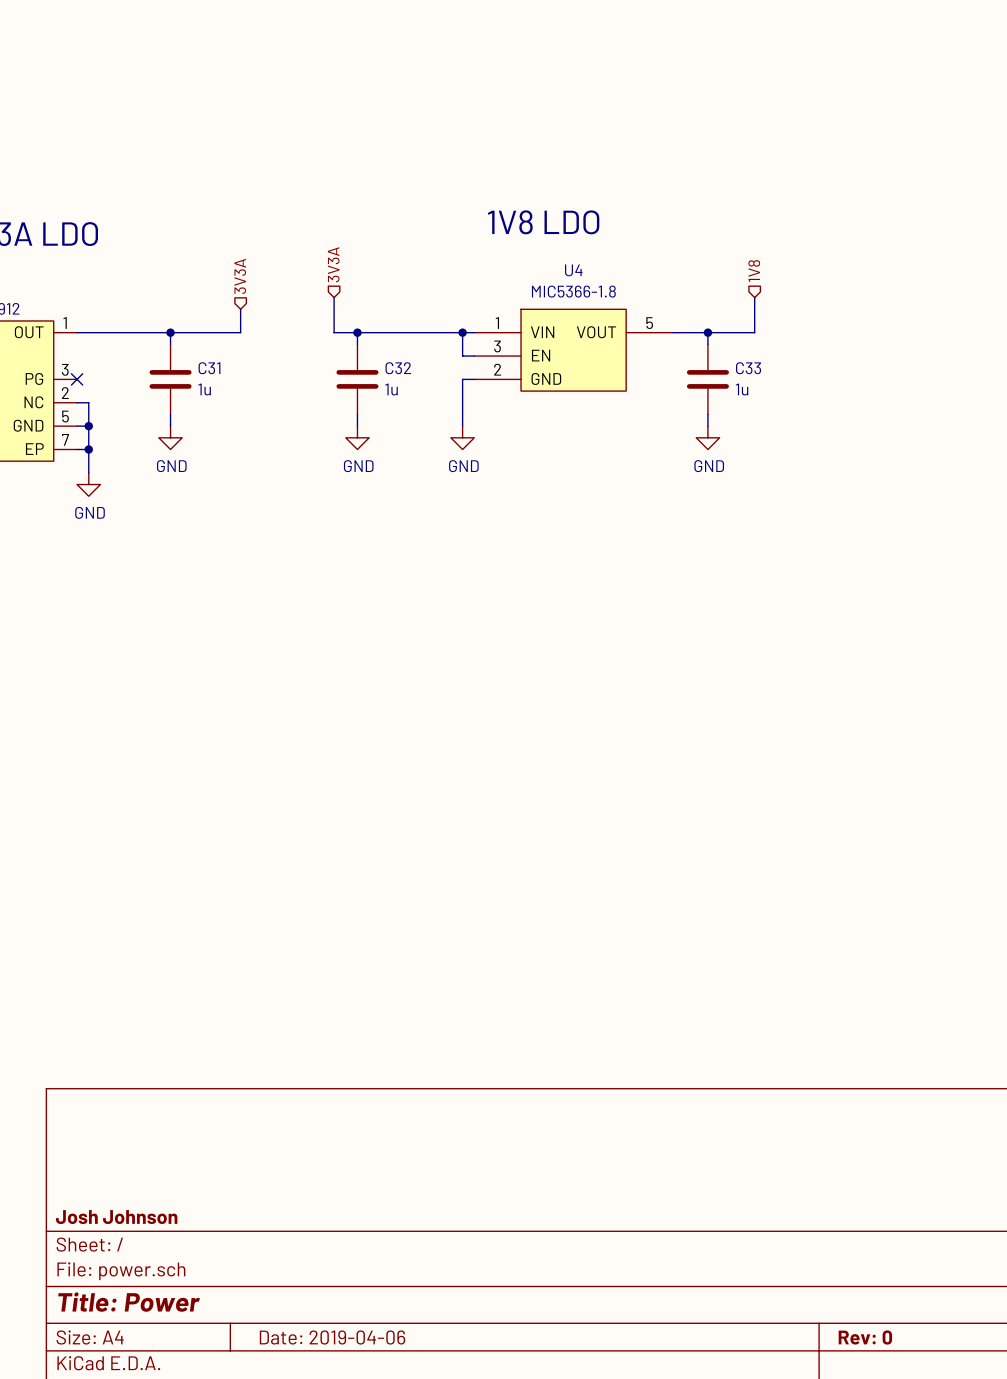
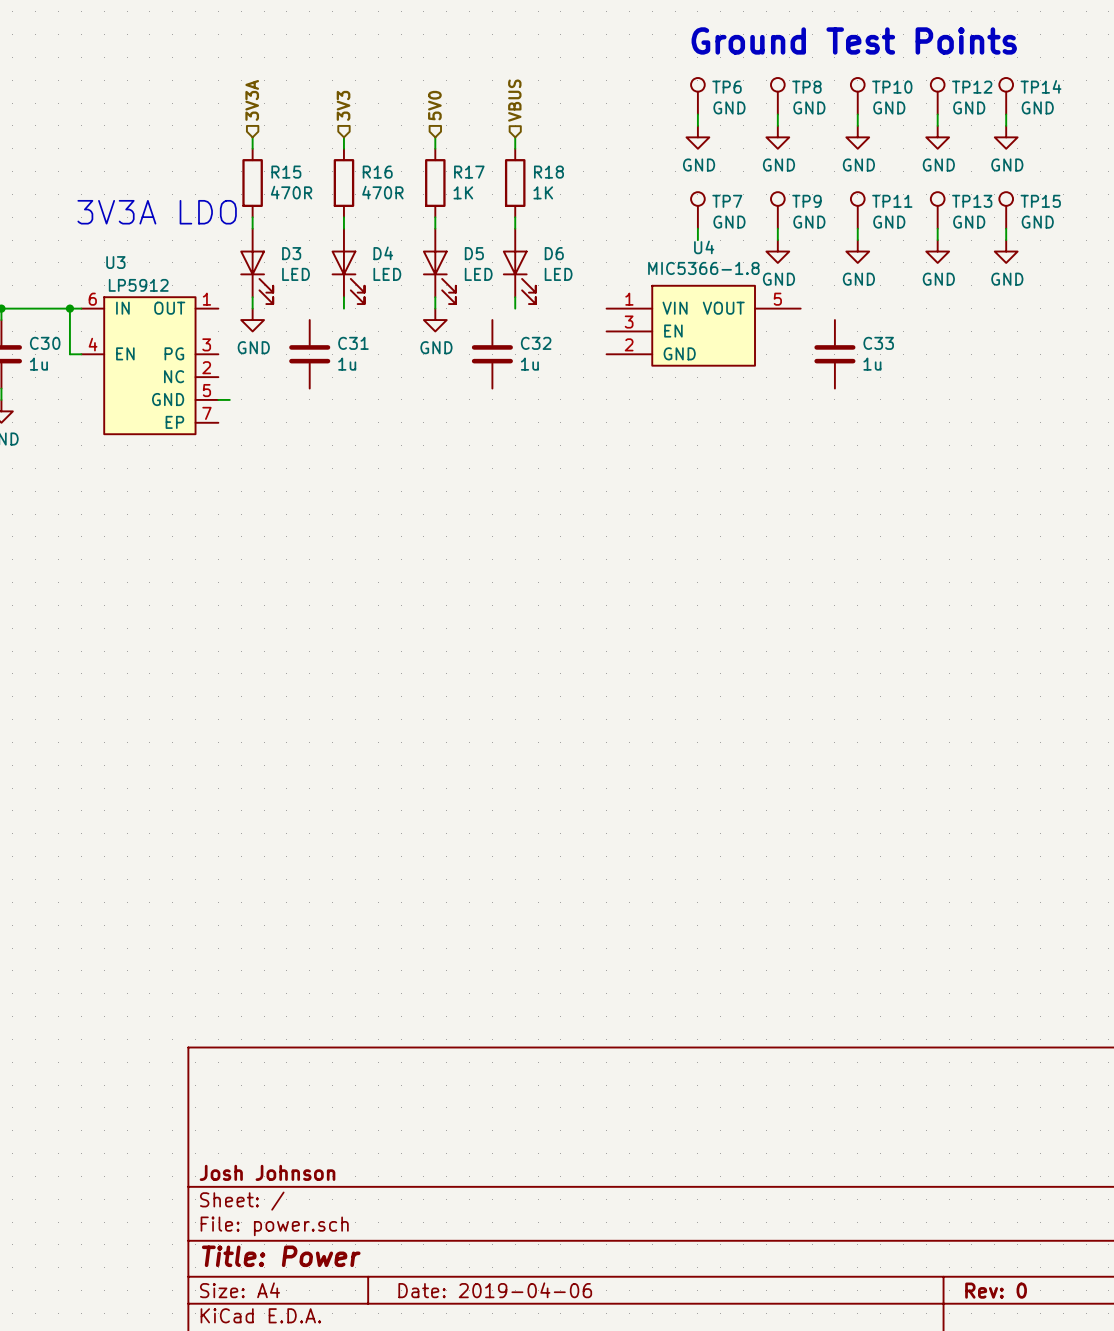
text: none -> Ground Test Points (854, 40)
TP6: none -> GND (697, 96)
TP8: none -> GND (777, 96)
TP10: none -> GND (857, 96)
TP12: none -> GND (937, 96)
TP14: none -> GND (1006, 96)
hierarchical label: none -> 3V3A (252, 100)
hierarchical label: none -> VBUS (514, 100)
hierarchical label: none -> 3V3 (343, 105)
hierarchical label: none -> 5V0 (434, 105)
wire: none -> (697, 114) (697, 125)
wire: none -> (777, 114) (777, 125)
wire: none -> (857, 114) (857, 125)
wire: none -> (937, 114) (937, 125)
wire: none -> (1006, 114) (1006, 125)
wire: none -> (252, 137) (252, 148)
wire: none -> (343, 137) (343, 148)
wire: none -> (435, 137) (435, 148)
wire: none -> (515, 137) (515, 148)
power symbol: none -> GND (697, 137)
power symbol: none -> GND (777, 137)
power symbol: none -> GND (857, 137)
power symbol: none -> GND (937, 137)
power symbol: none -> GND (1006, 137)
R15: none -> 470R (252, 183)
R16: none -> 470R (343, 183)
R17: none -> 1K (435, 183)
R18: none -> 1K (515, 183)
text: 1V8 LDO (543, 222) -> none
TP7: none -> GND (697, 210)
TP9: none -> GND (777, 210)
TP11: none -> GND (857, 210)
TP13: none -> GND (937, 210)
TP15: none -> GND (1006, 210)
wire: none -> (343, 217) (343, 228)
wire: none -> (515, 217) (515, 228)
wire: none -> (697, 228) (697, 240)
wire: none -> (937, 228) (937, 240)
wire: none -> (1006, 228) (1006, 240)
hierarchical label: 3V3A (333, 264) -> none
hierarchical label: 1V8 (754, 271) -> none
power symbol: none -> GND (777, 251)
power symbol: none -> GND (857, 251)
power symbol: none -> GND (937, 251)
power symbol: none -> GND (1006, 251)
hierarchical label: 3V3A (240, 276) -> none
D3: none -> LED (256, 266)
D4: none -> LED (348, 266)
D5: none -> LED (439, 266)
D6: none -> LED (519, 266)
wire: (334, 297) (334, 332) (474, 332) -> none
wire: (754, 297) (754, 332) (672, 332) -> none
wire: (240, 309) (240, 332) (77, 332) -> none
wire: none -> (343, 297) (343, 308)
wire: none -> (515, 297) (515, 308)
wire: (170, 332) (170, 344) -> (252, 217) (252, 228)
junction: (170, 332) -> none
wire: (357, 332) (357, 344) -> (435, 217) (435, 228)
junction: (357, 332) -> none
wire: (462, 332) (462, 356) (474, 356) -> none
junction: (462, 332) -> none
wire: (707, 332) (707, 344) -> (857, 228) (857, 240)
junction: (707, 332) -> none
power symbol: none -> GND (252, 320)
power symbol: none -> GND (435, 320)
no-connect mark: (77, 379) -> none
wire: (474, 379) (462, 379) (462, 426) -> none
wire: (77, 402) (88, 402) (88, 472) -> none
wire: (170, 414) (170, 426) -> (252, 297) (252, 308)
wire: (357, 414) (357, 426) -> (435, 297) (435, 308)
wire: (707, 414) (707, 426) -> (777, 228) (777, 240)
junction: (88, 426) -> none
power symbol: GND (170, 437) -> none
power symbol: GND (357, 437) -> none
power symbol: GND (462, 437) -> none
power symbol: GND (707, 437) -> none
wire: (77, 449) (88, 449) -> none
junction: (88, 449) -> none
power symbol: GND (88, 484) -> none

